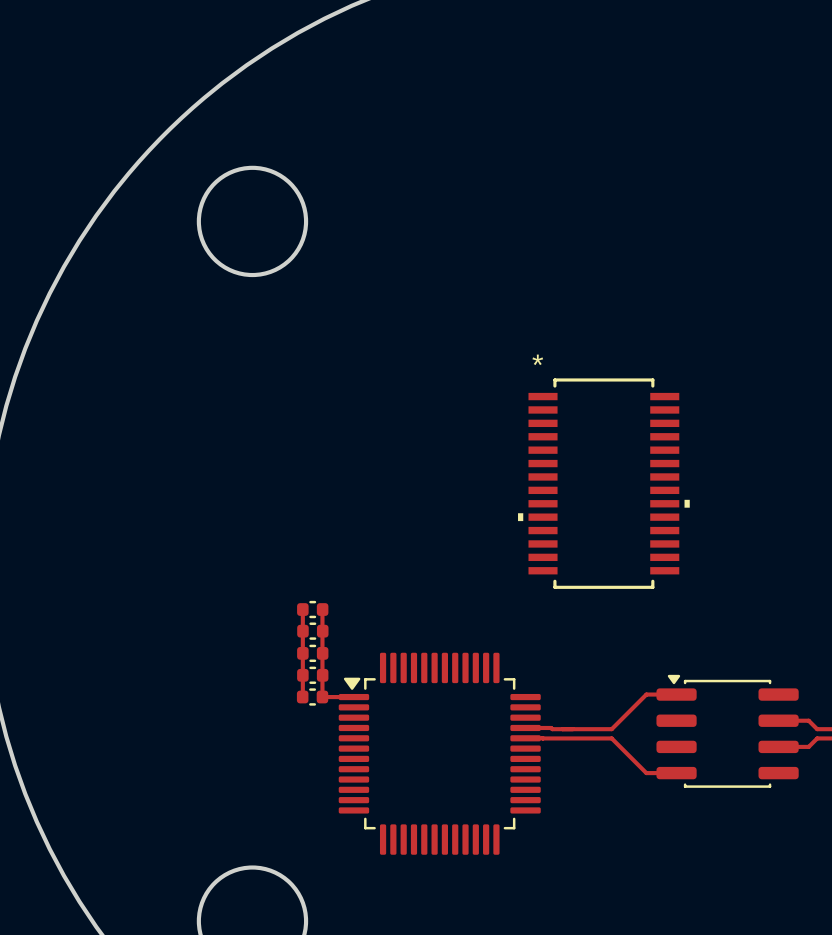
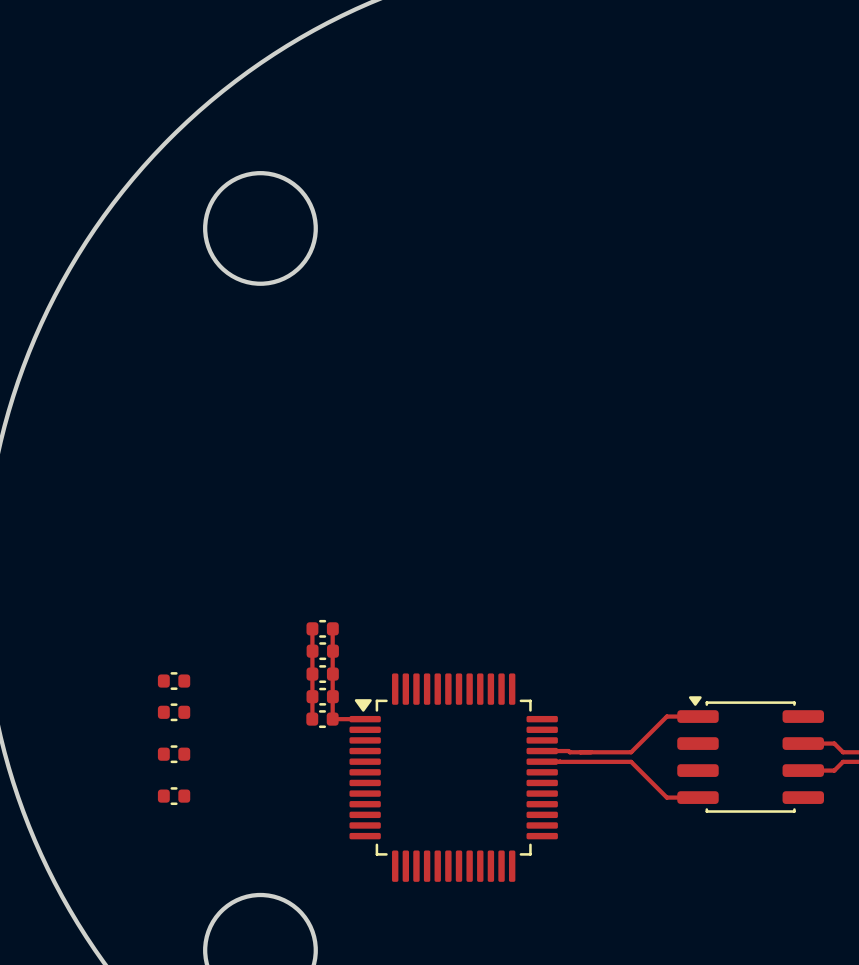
part: (603, 483) -> none
part: none -> (174, 681)
part: none -> (174, 712)
part: none -> (174, 754)
part: none -> (174, 796)

